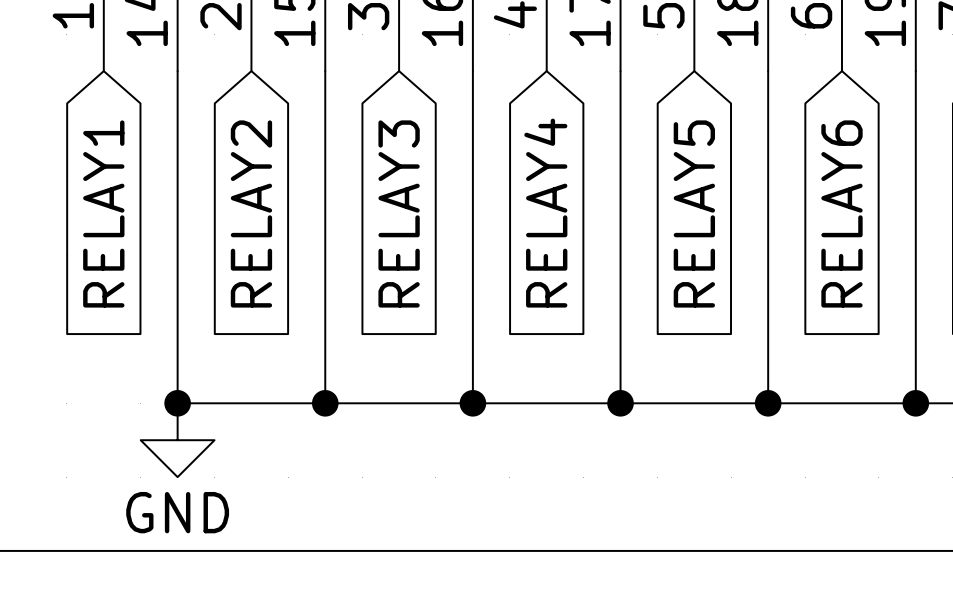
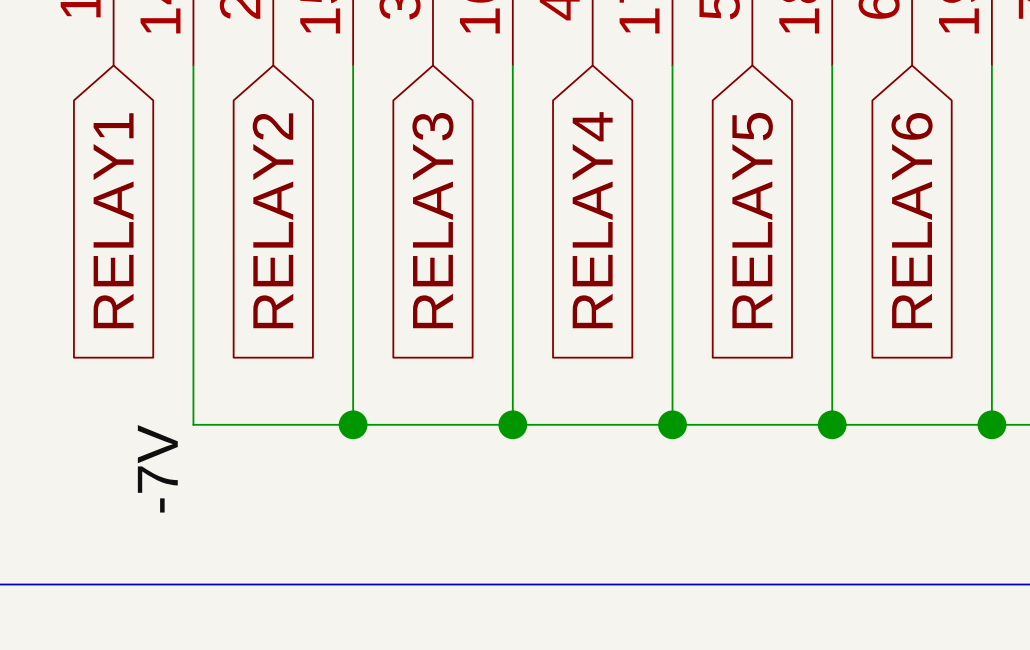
junction: (177, 403) -> none
power symbol: GND (177, 440) -> none
label: none -> -7V (157, 468)

